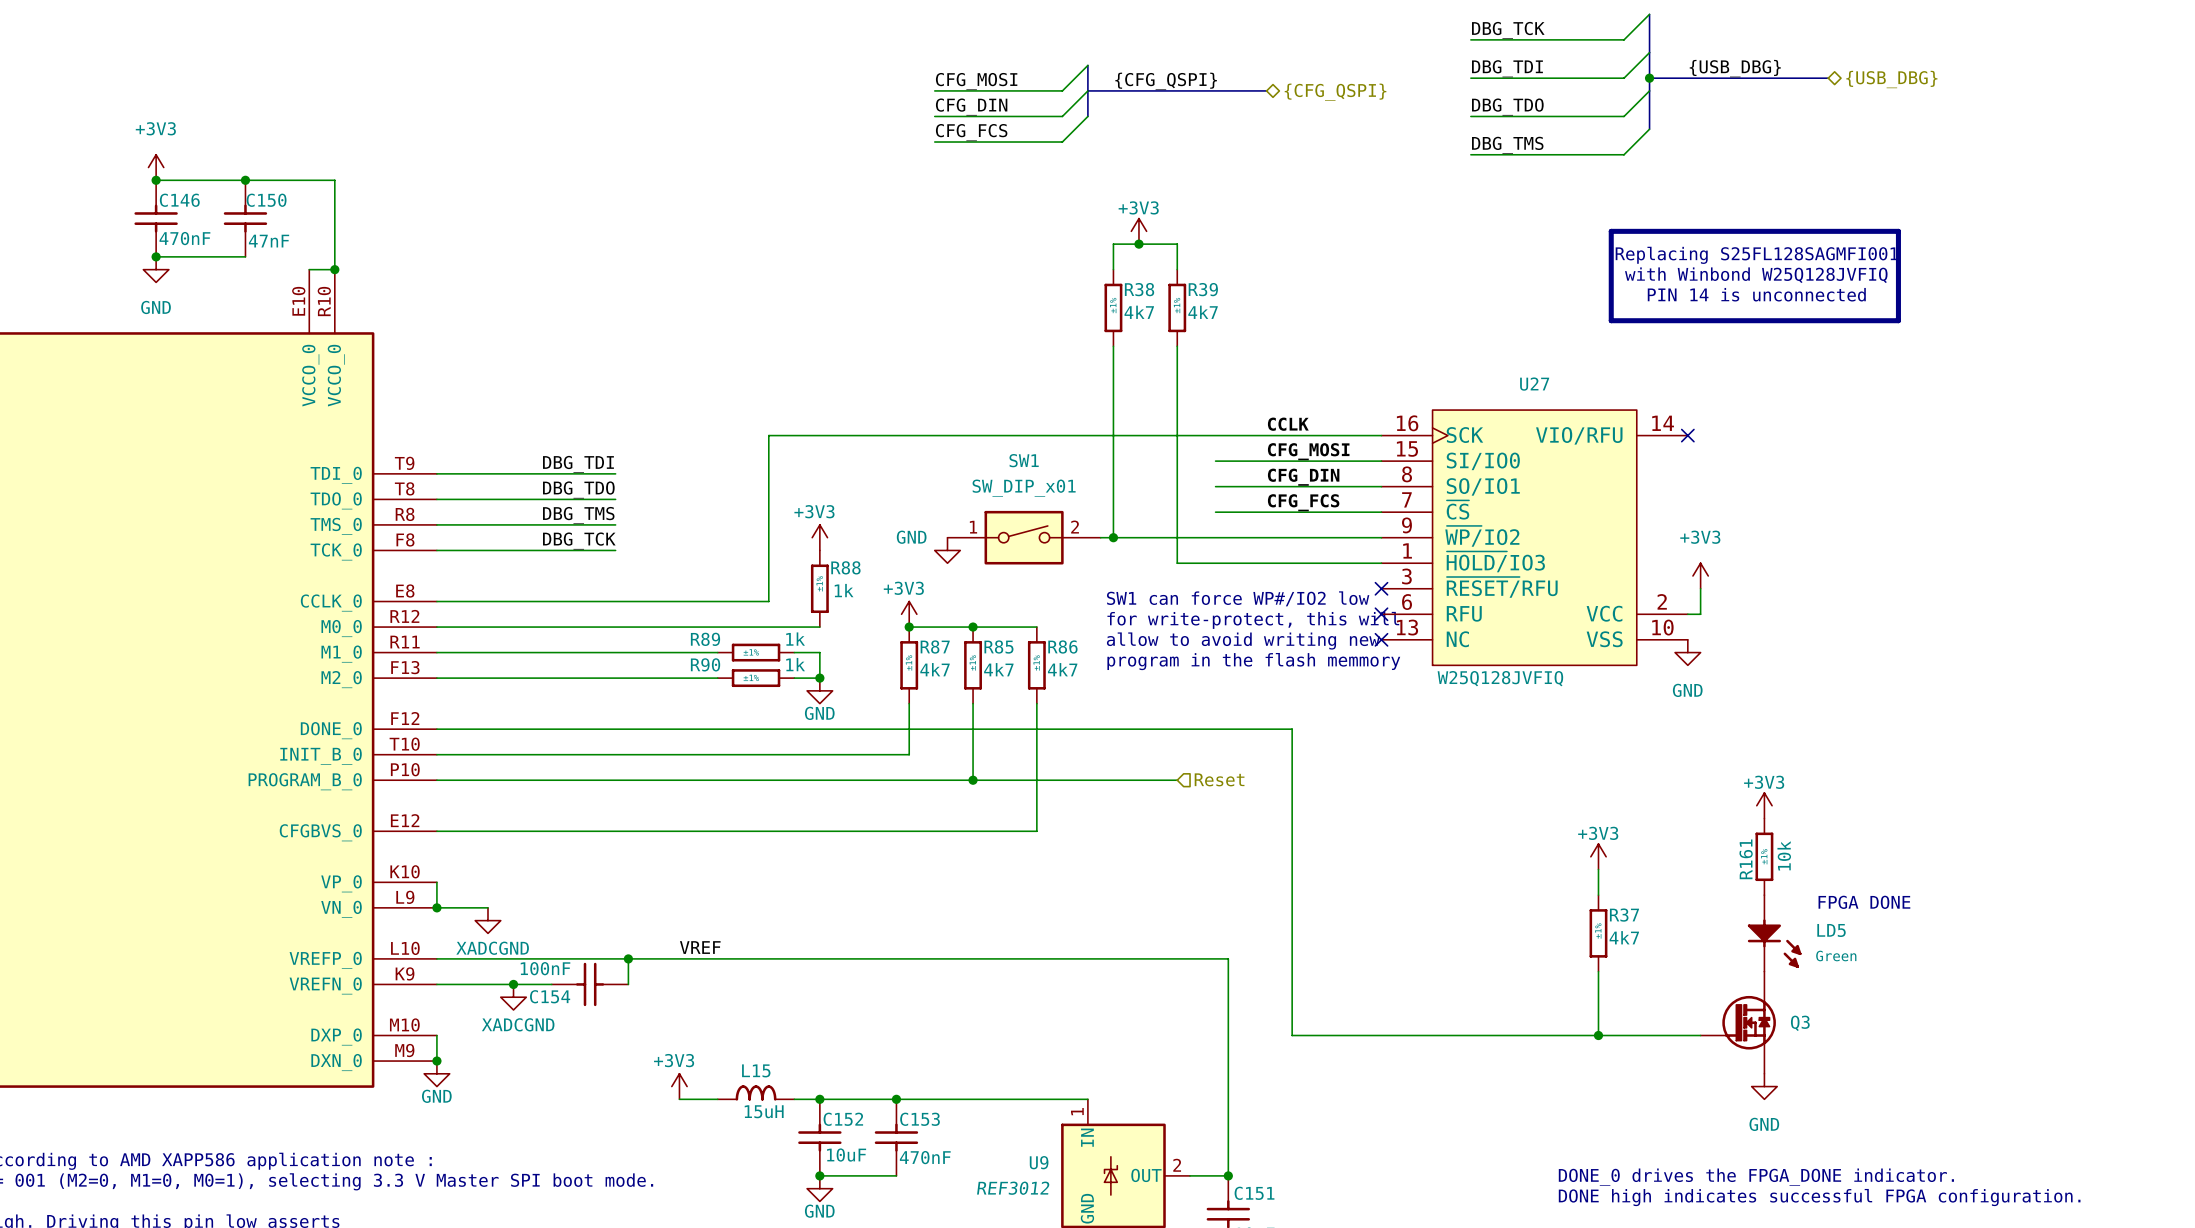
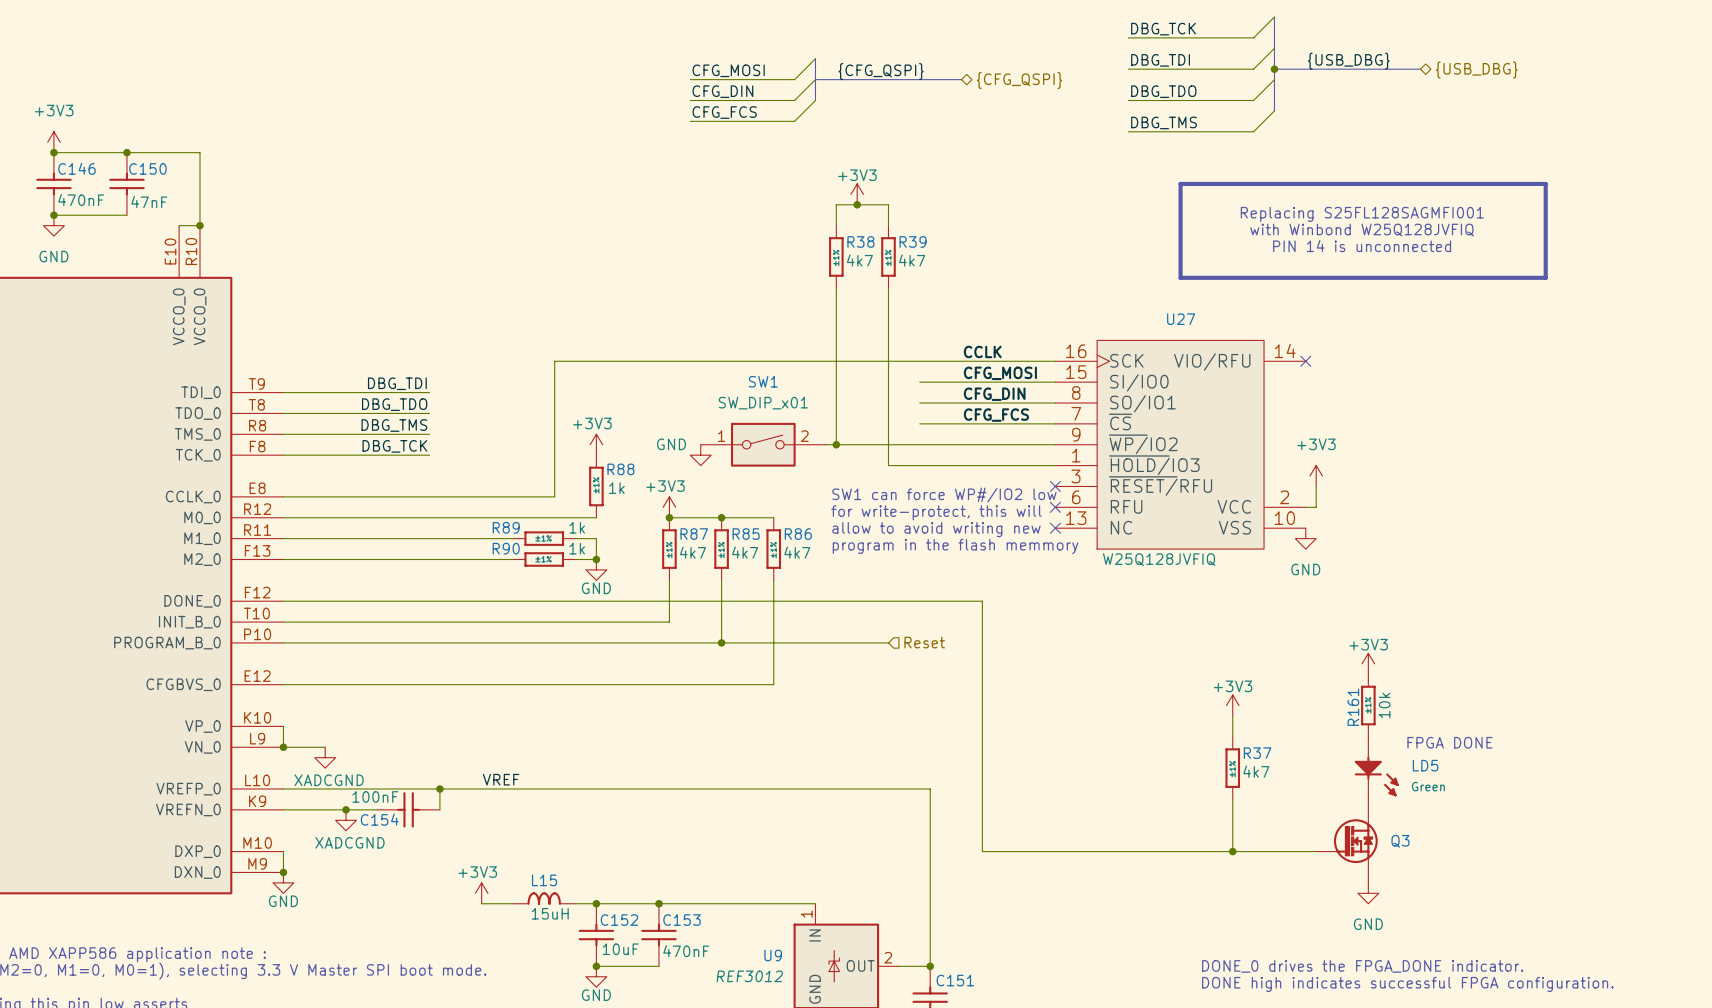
line: (1611, 231) (1898, 231) (1898, 320) (1611, 320) (1611, 231) -> (1180, 183) (1180, 277) (1545, 277) (1545, 183) (1180, 183)

